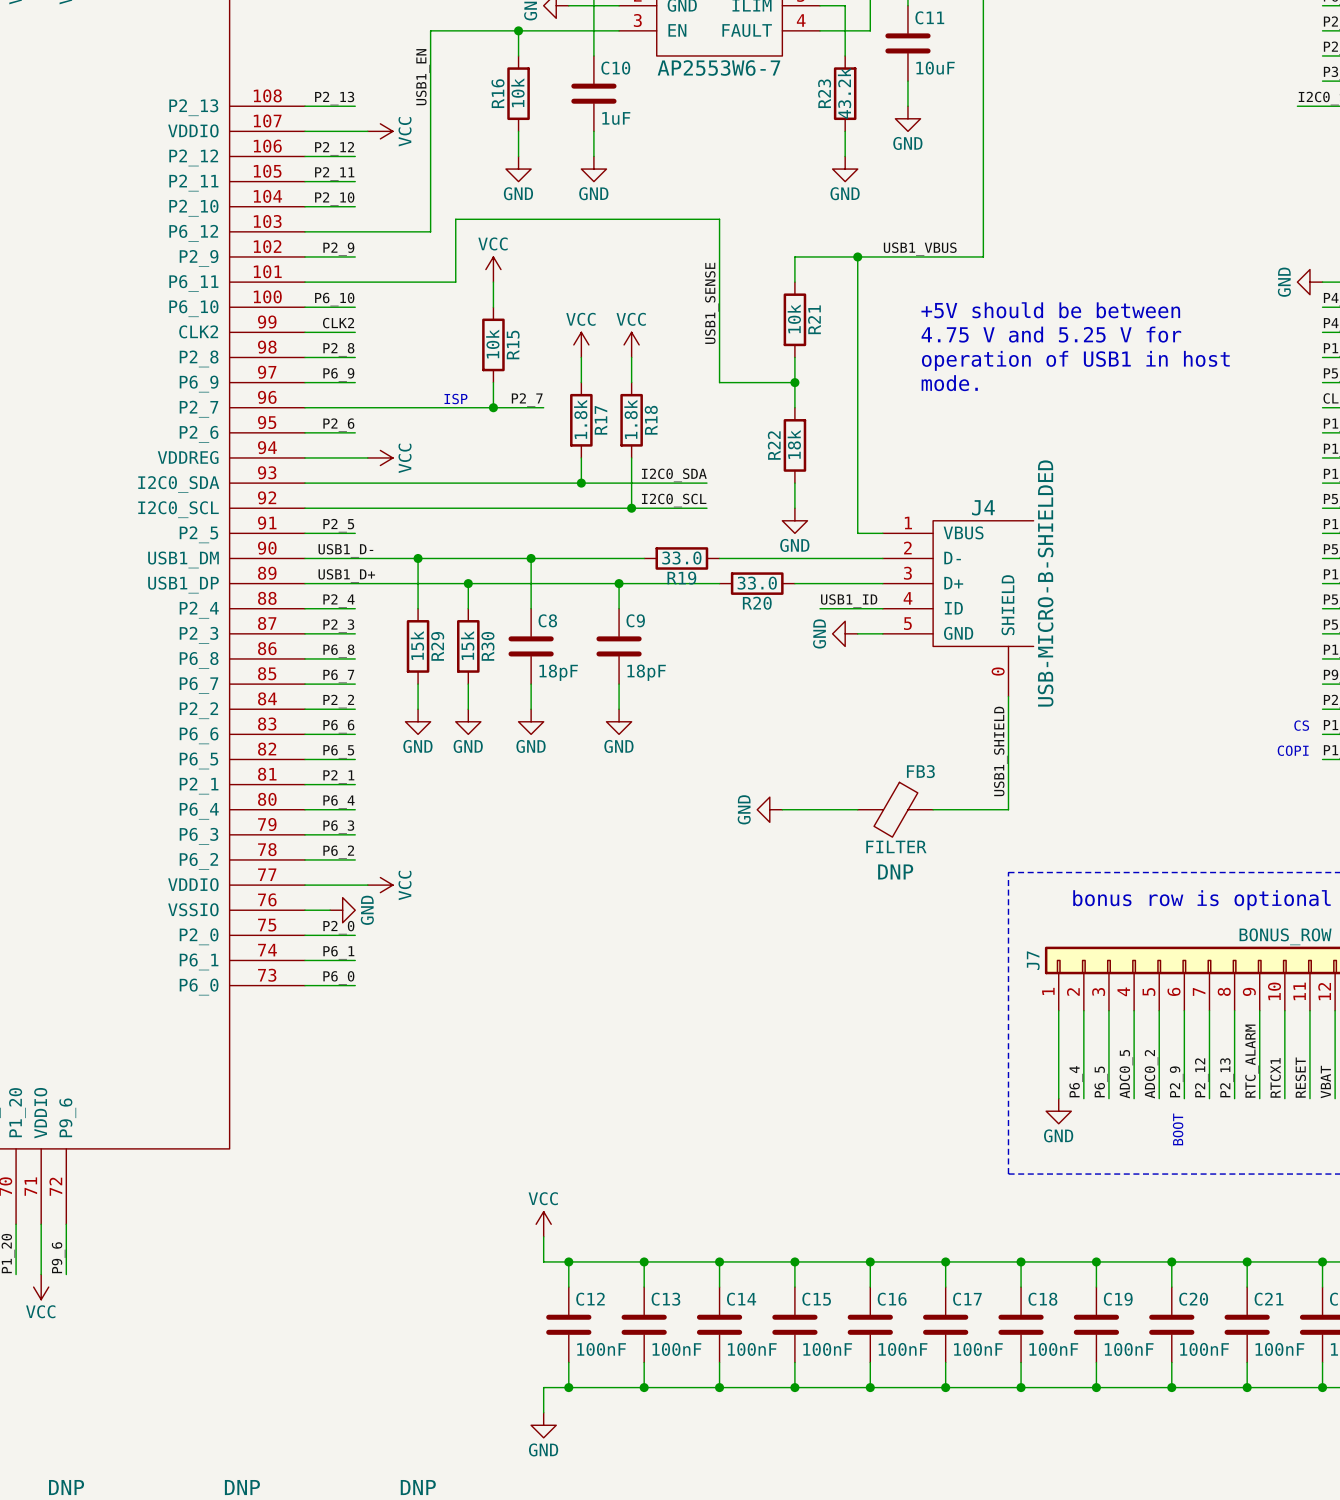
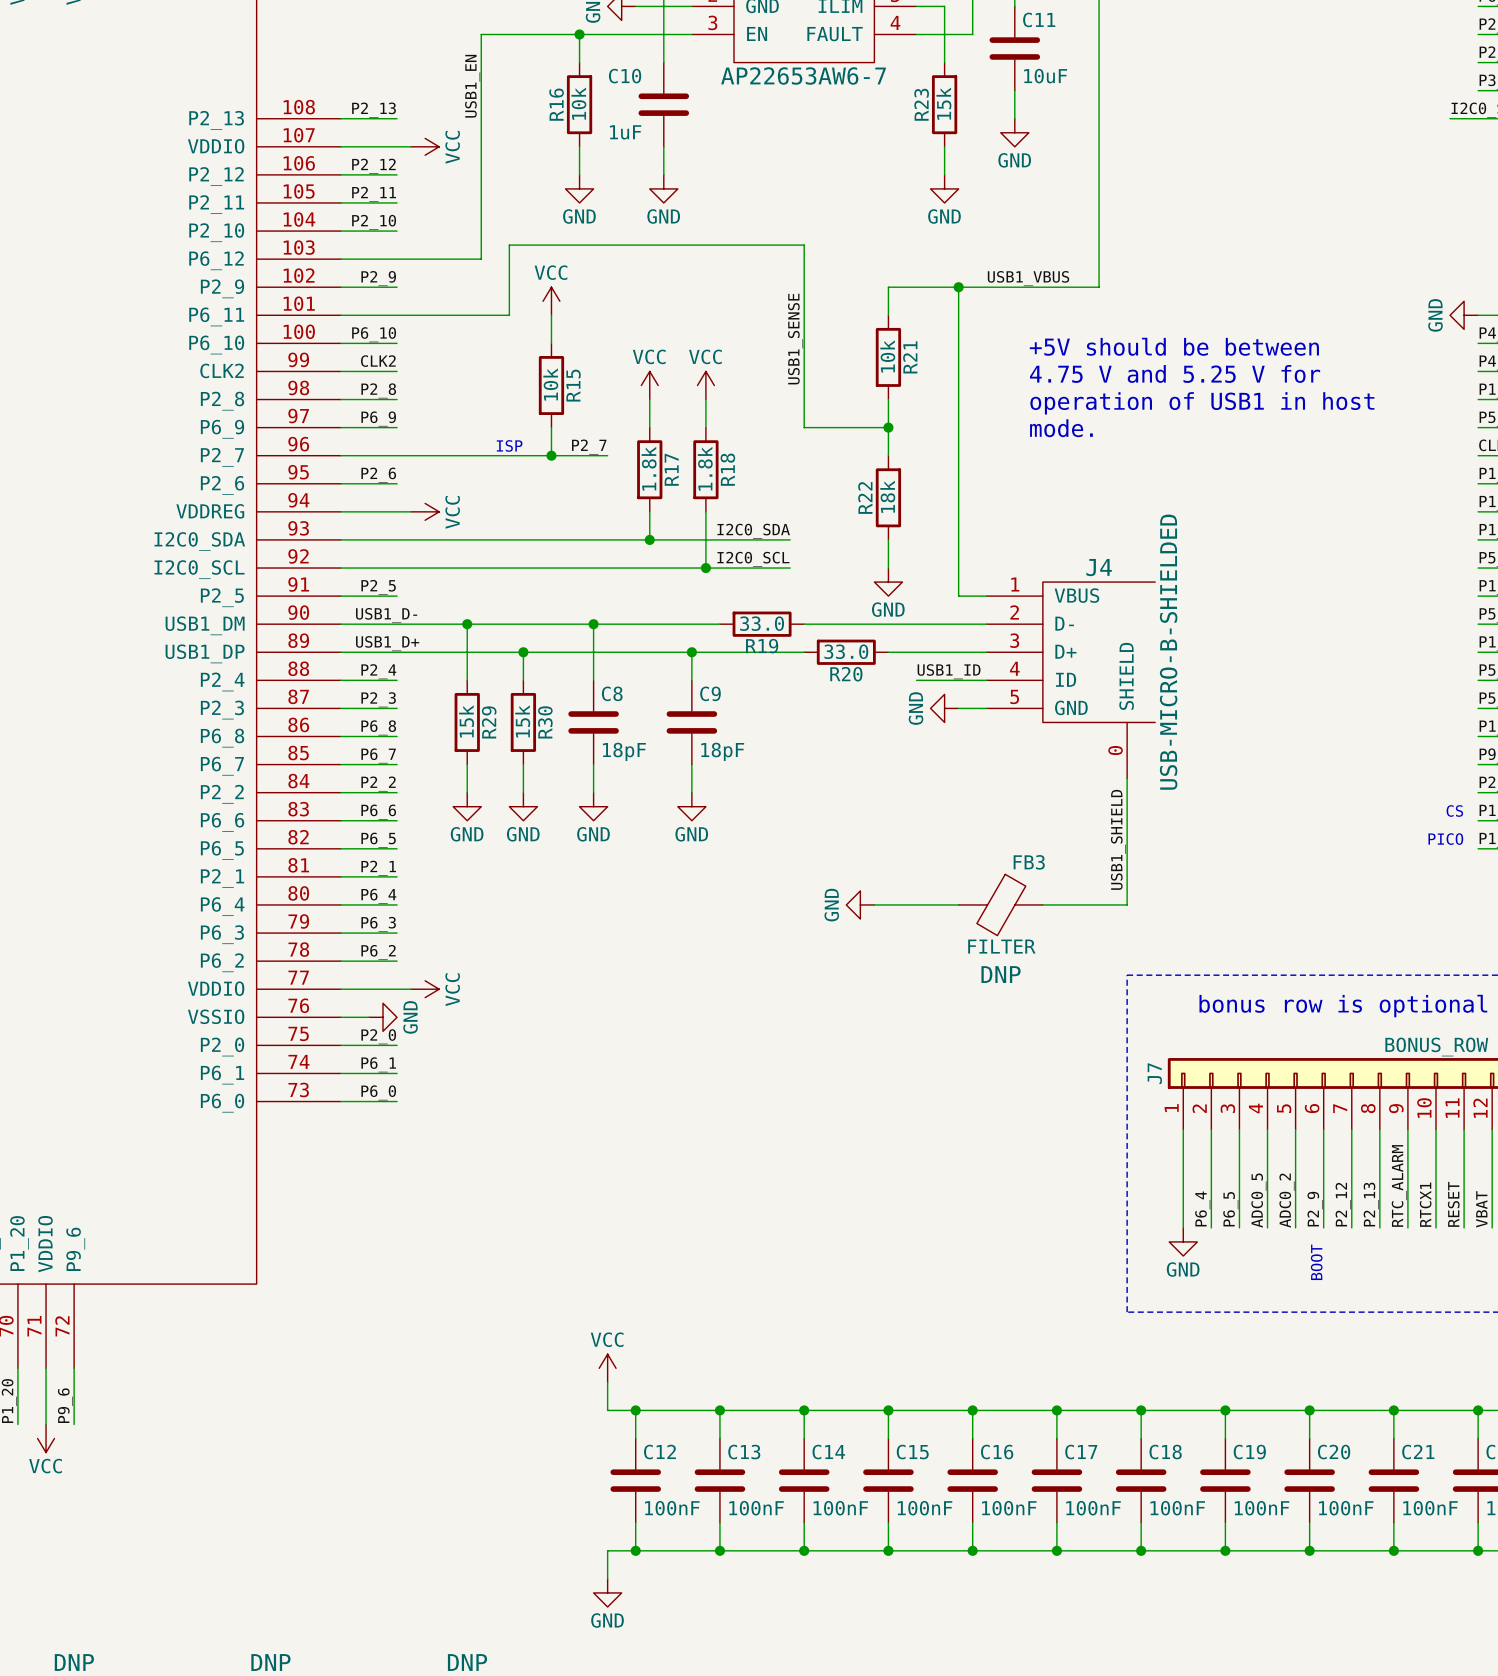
part value: AP2553W6-7 (718, 67) -> AP22653AW6-7 (803, 75)
C10 name position: C10 (615, 68) -> C10 (625, 76)
R23 value: 43.2k (844, 93) -> 15k (943, 103)
C10 value position: 1uF (616, 118) -> 1uF (625, 132)
text: COPI (1293, 750) -> PICO (1445, 839)

